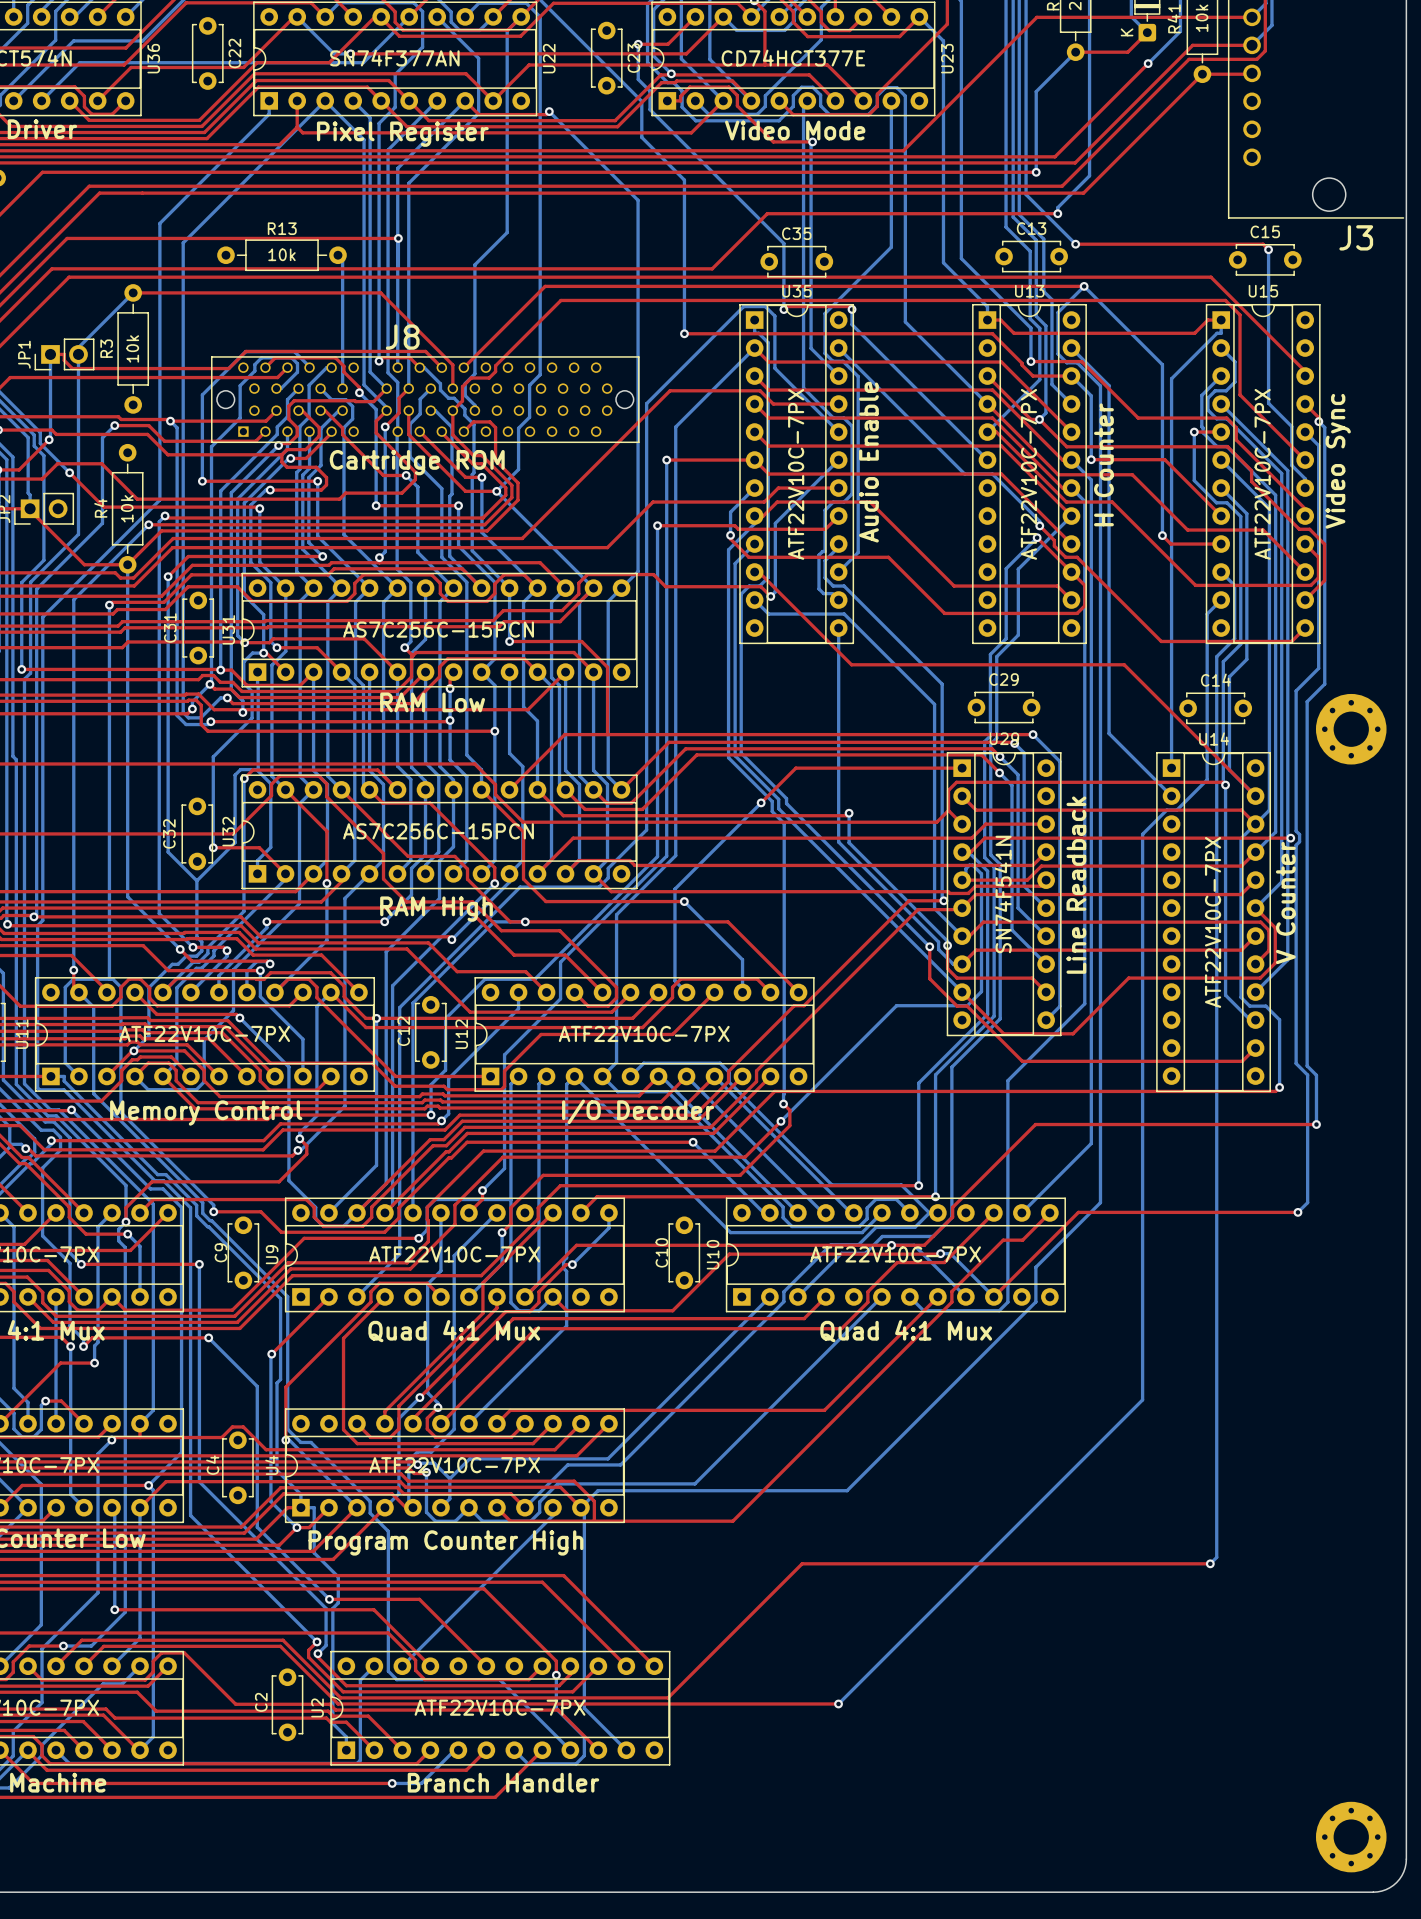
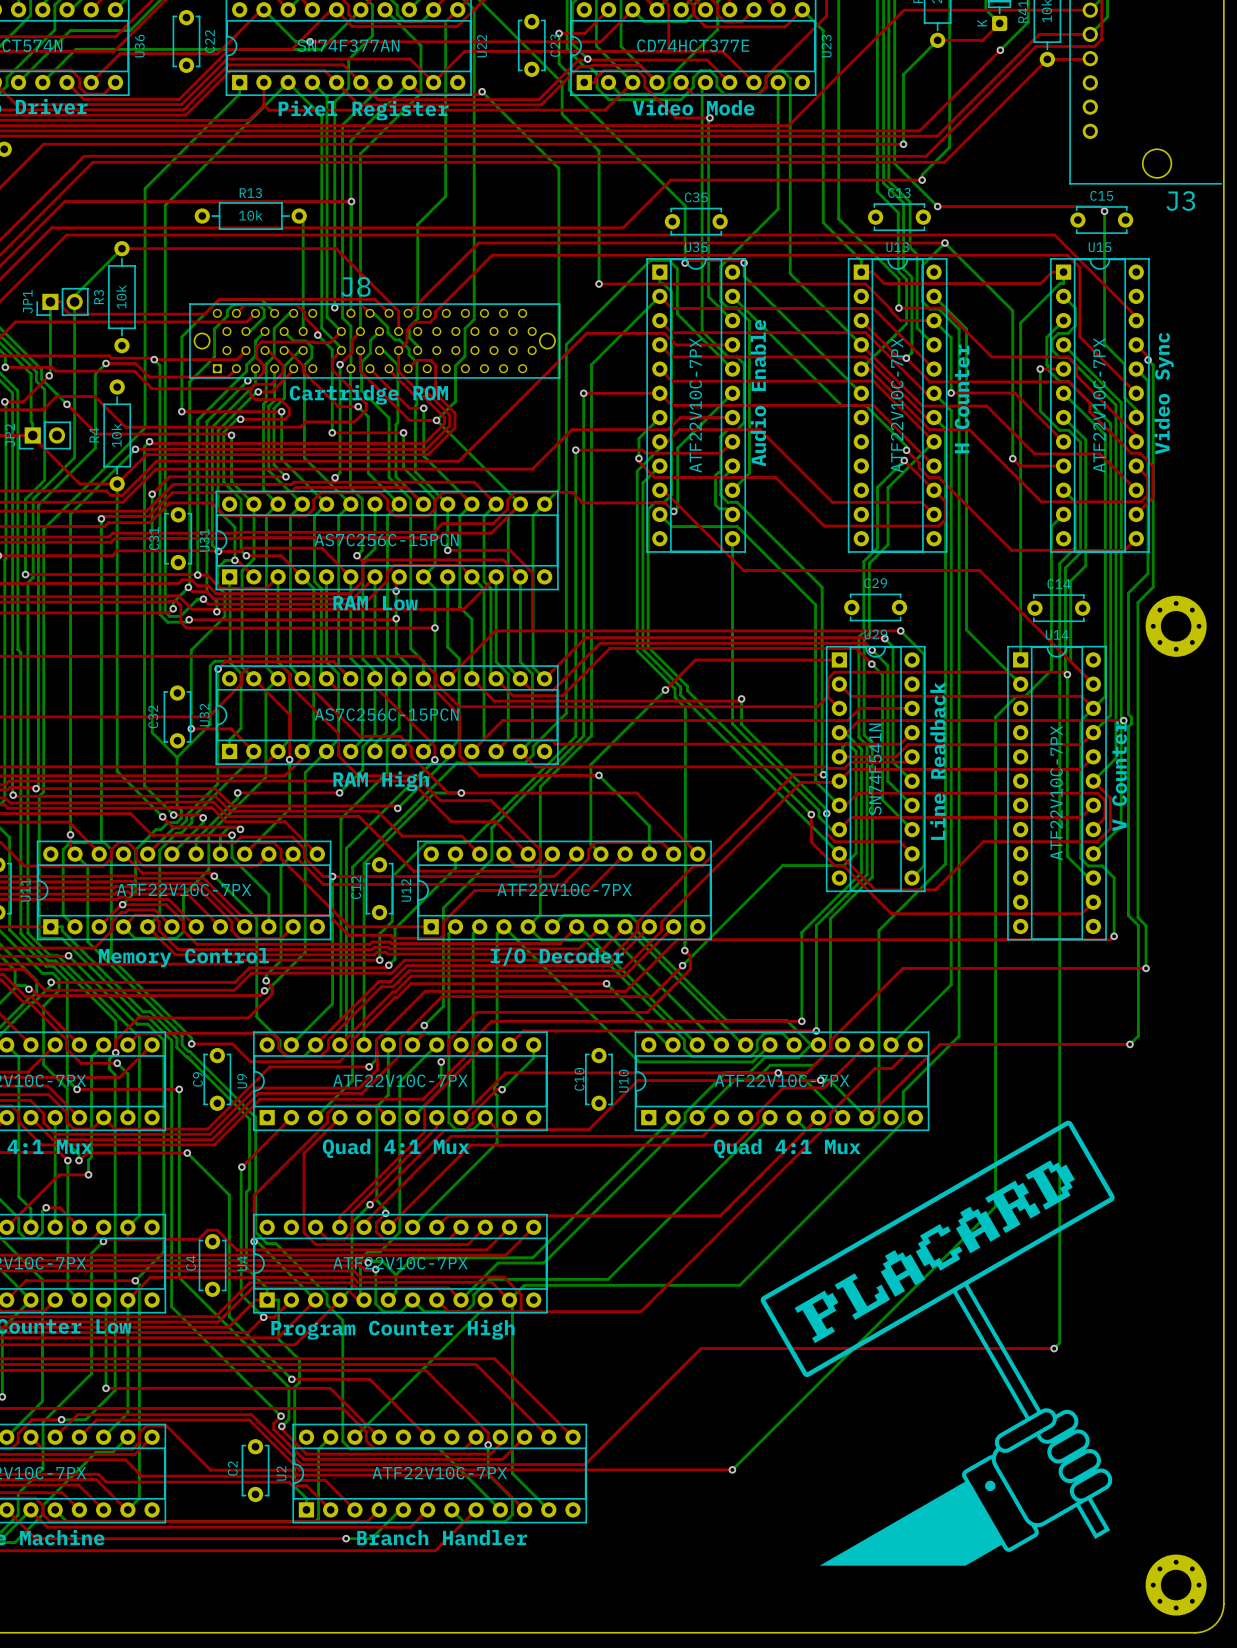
drawing: none -> [760, 1120, 1115, 1566]

